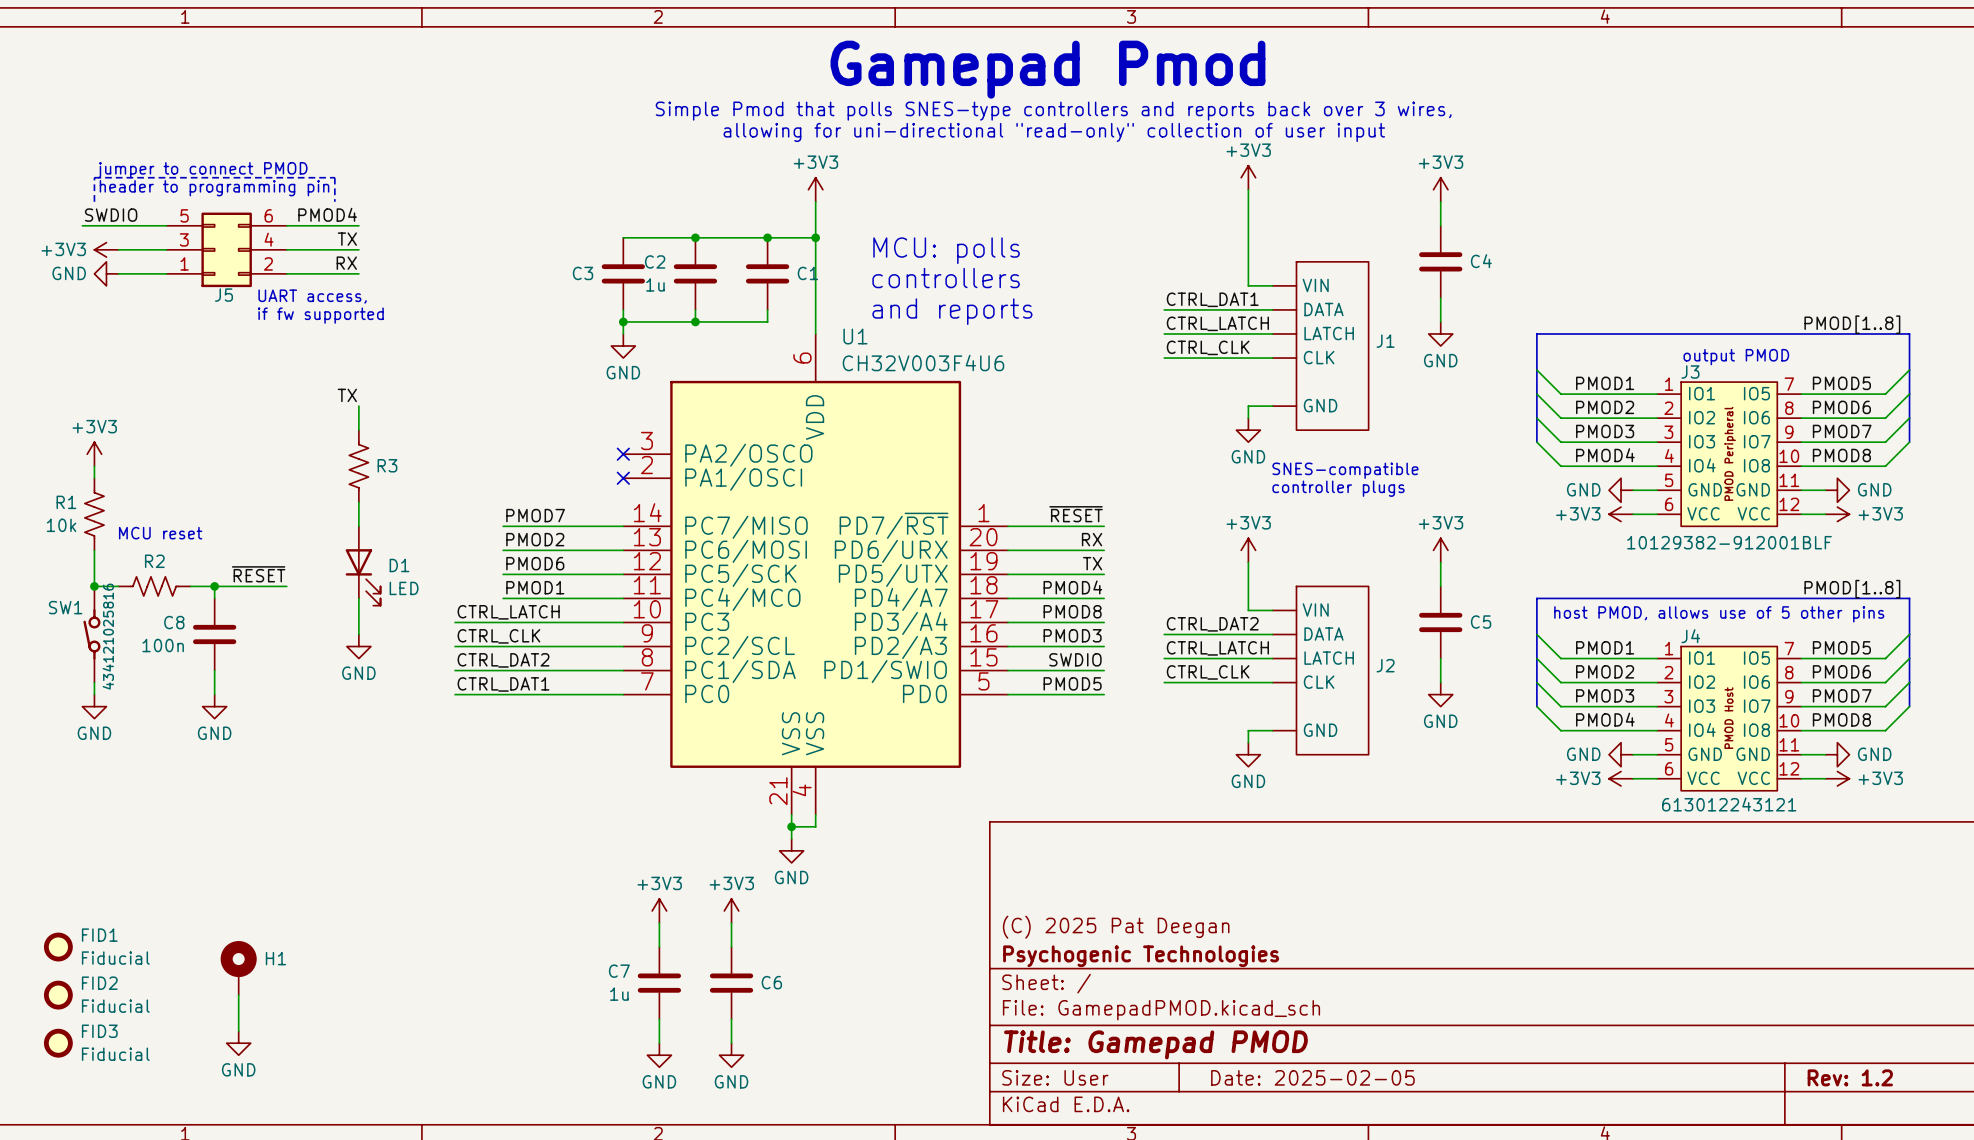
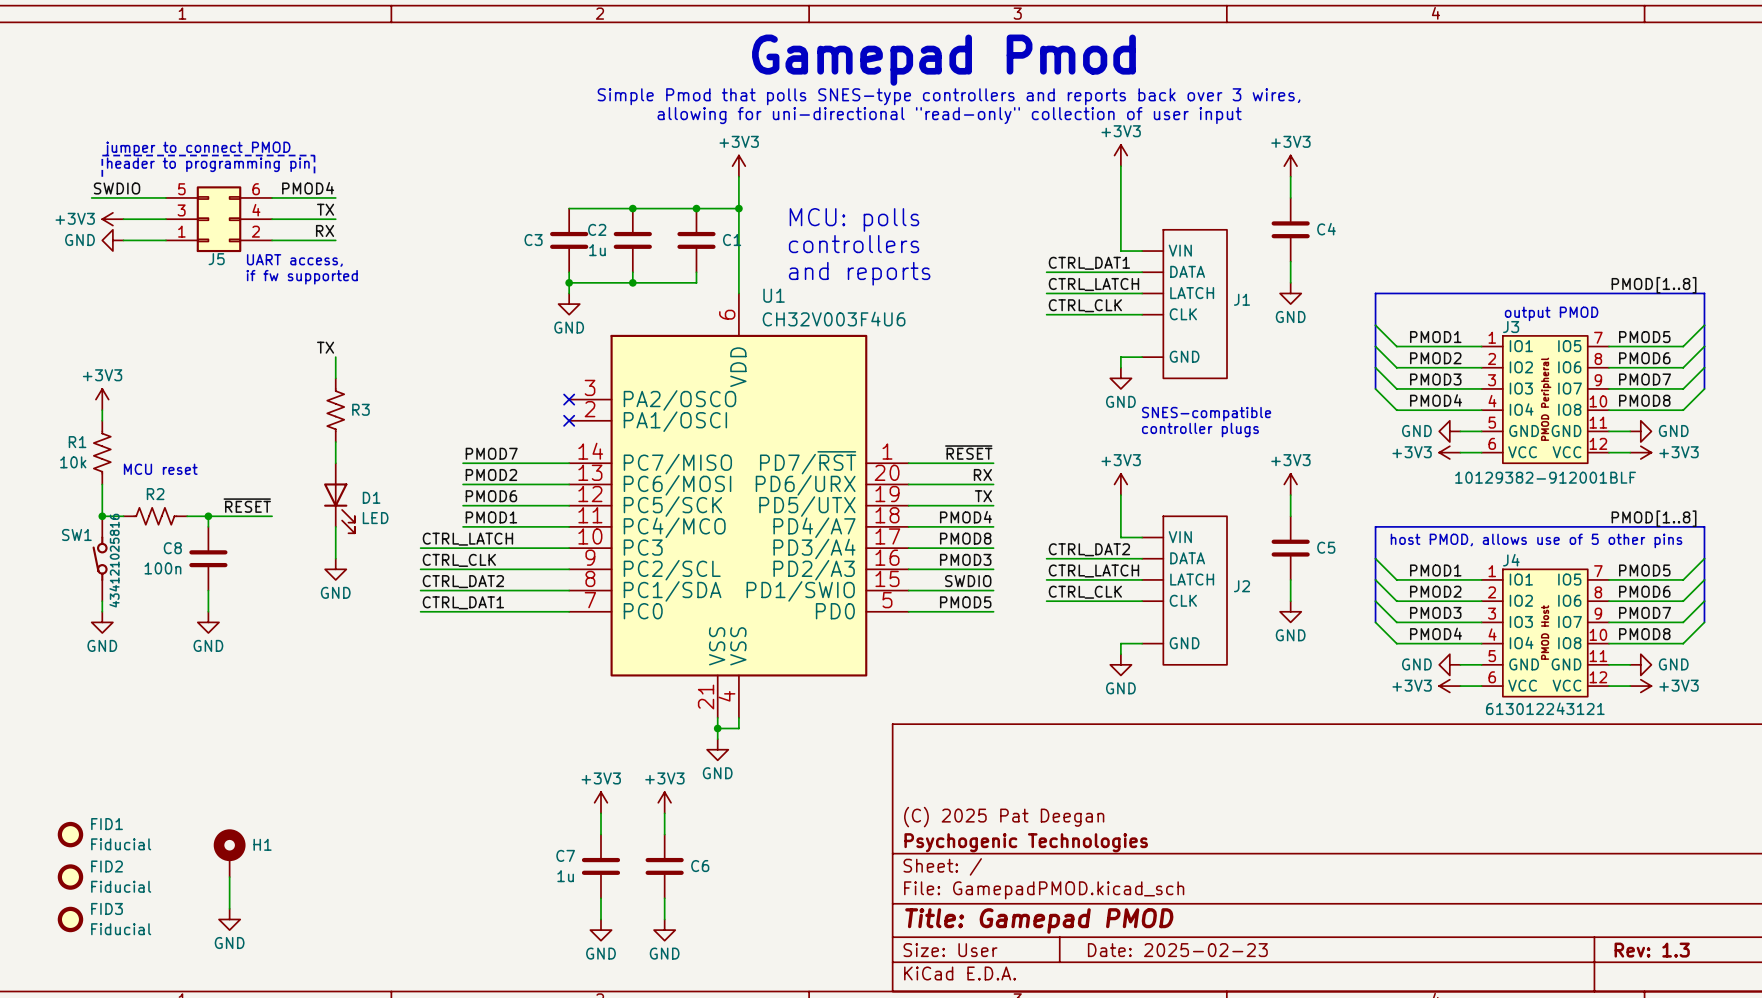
title block: Date: 2025-02-05 (1312, 1077) -> Date: 2025-02-23 (1177, 950)
title block: Rev: 1.2 (1850, 1077) -> Rev: 1.3 (1652, 950)

